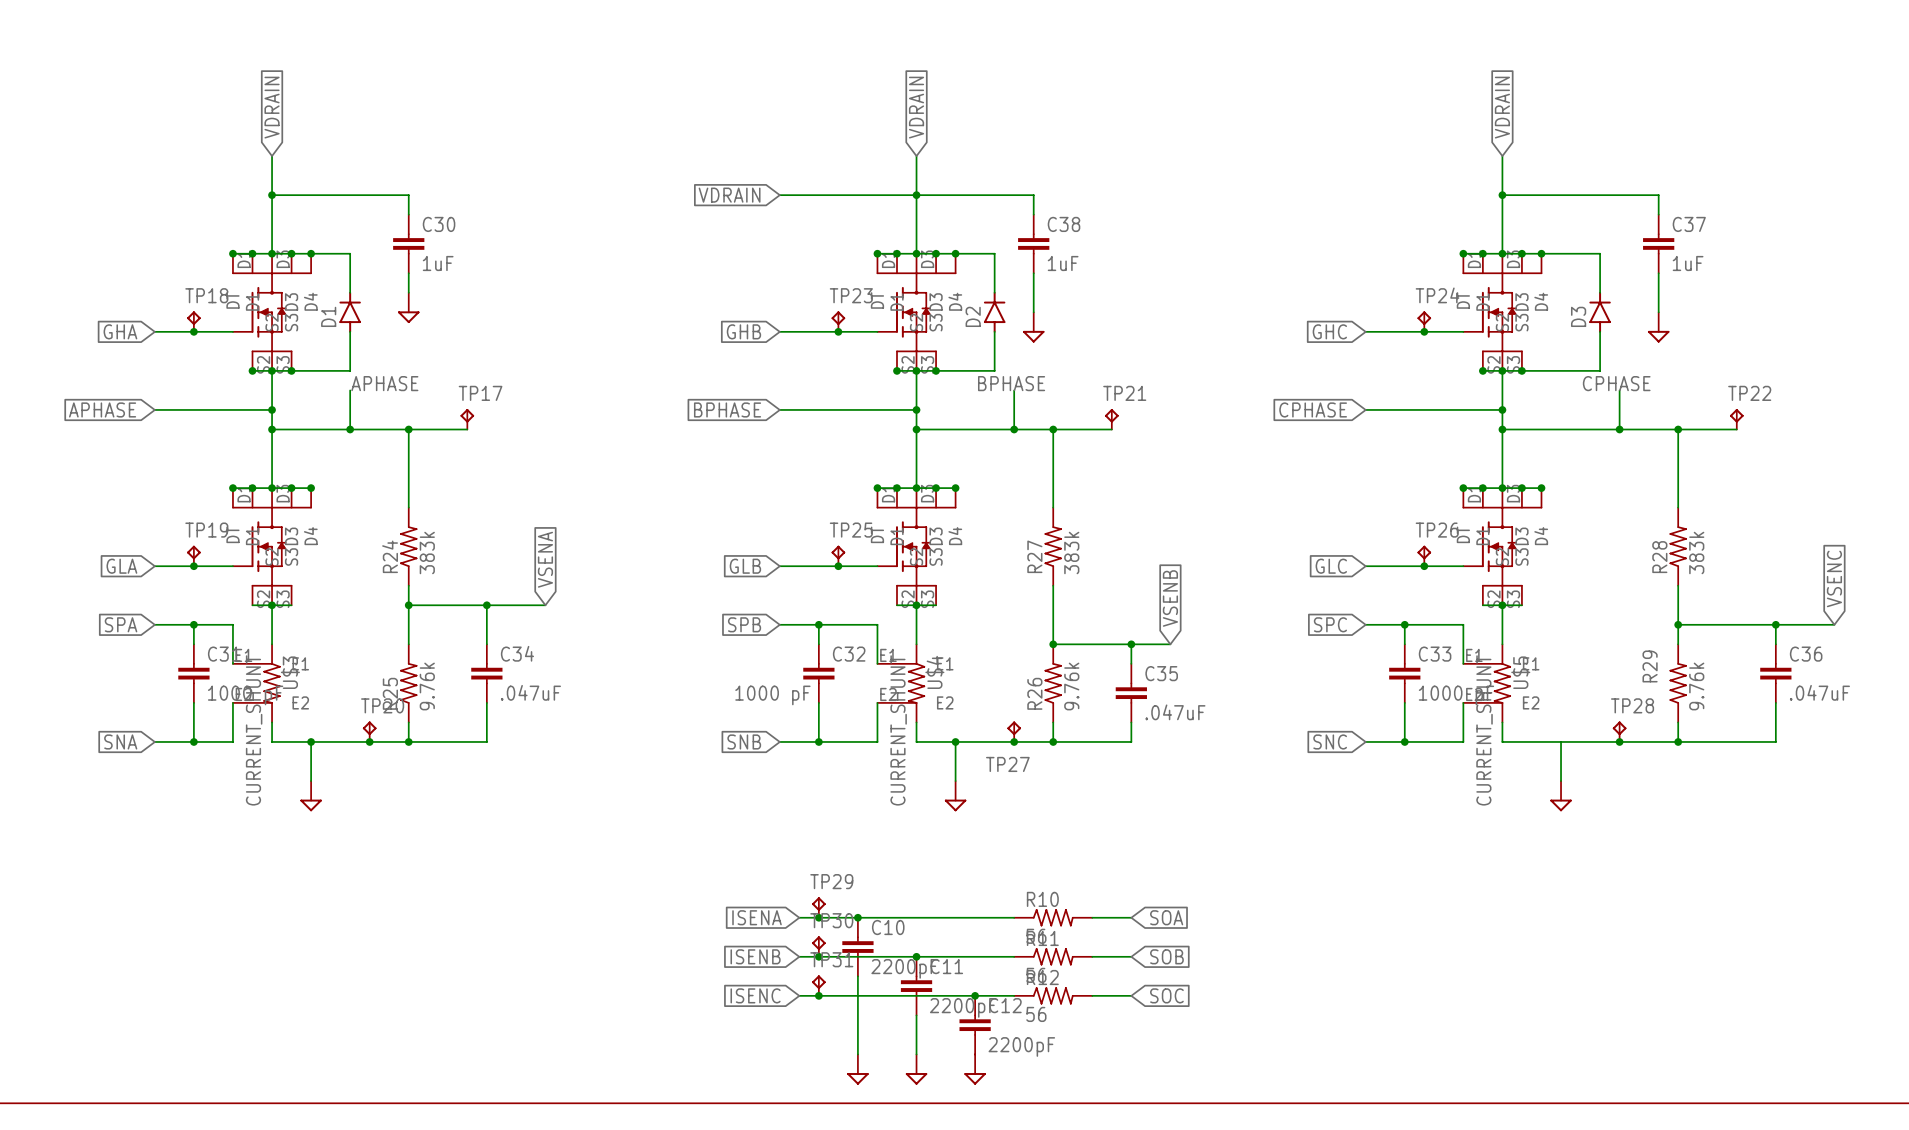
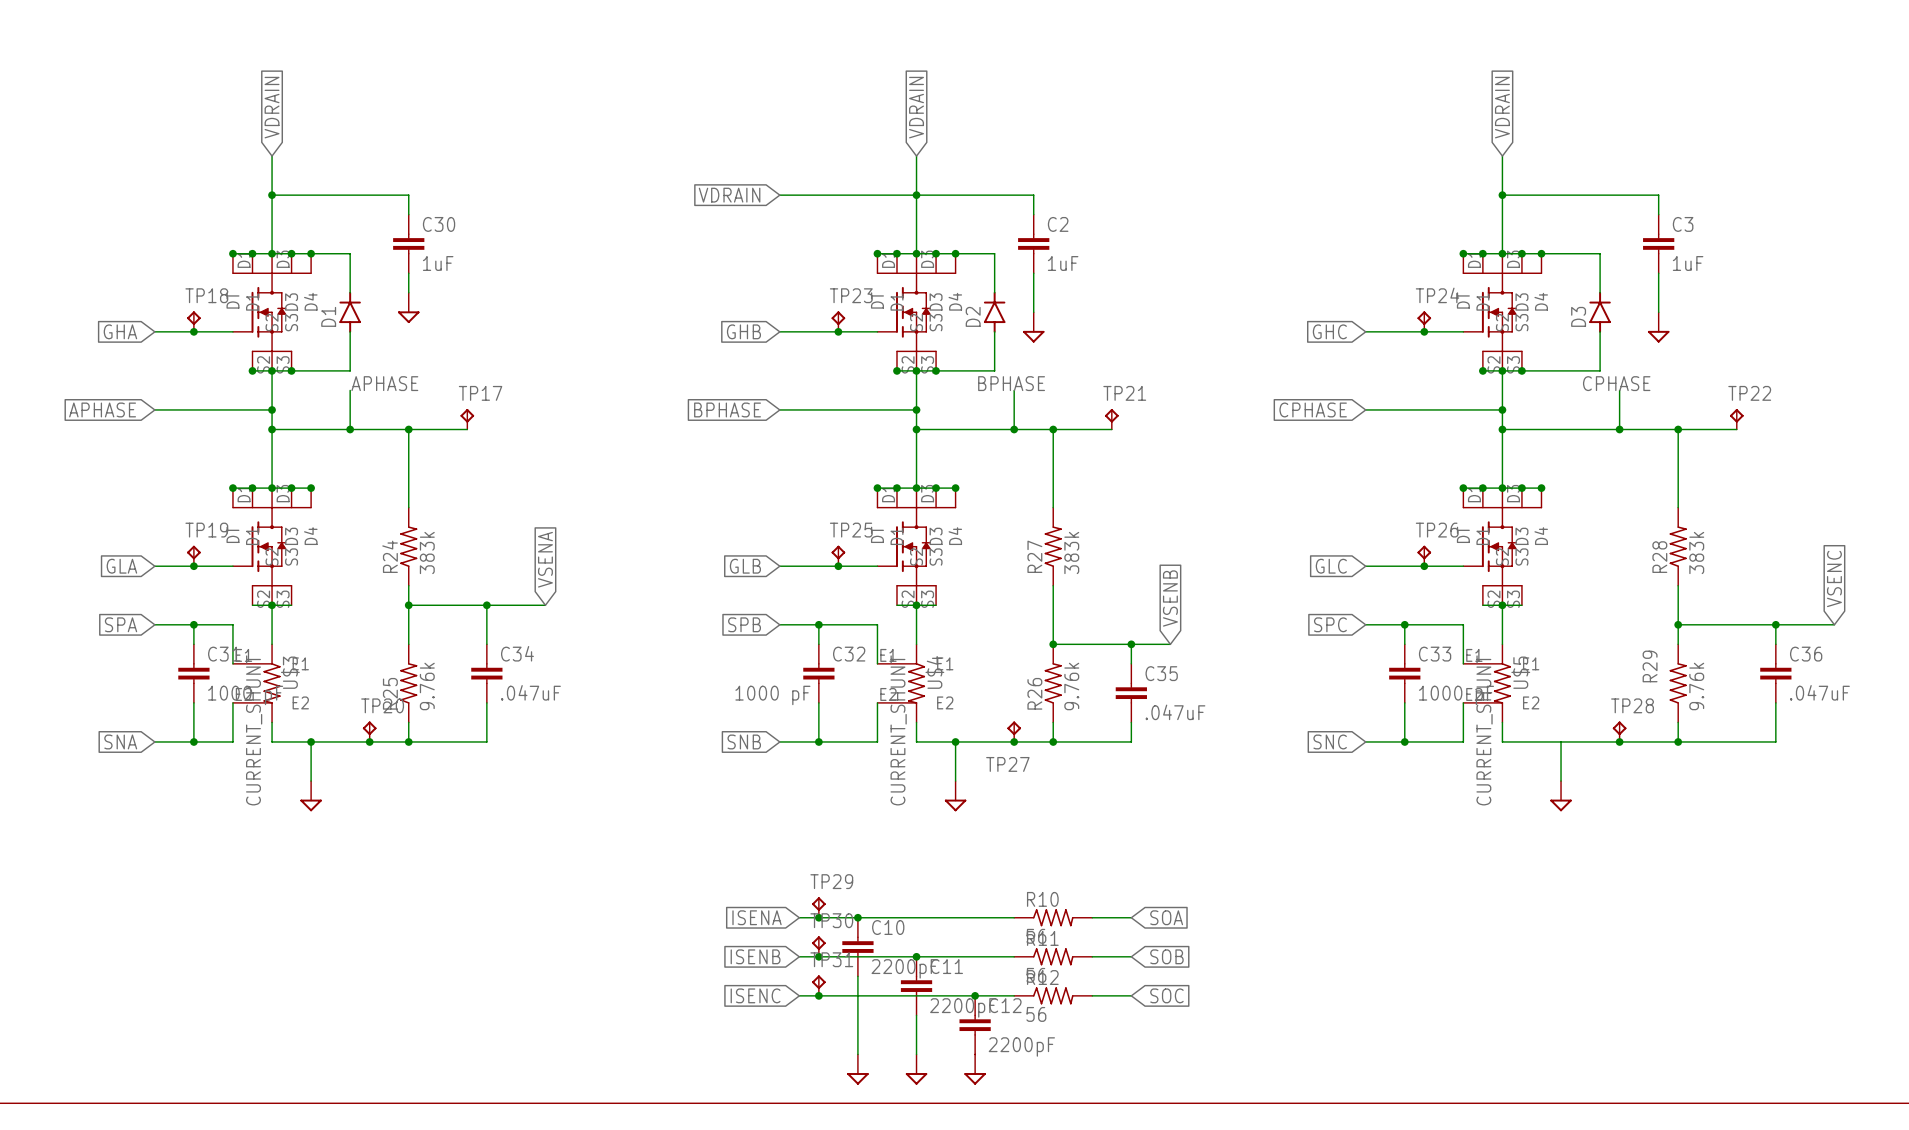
C38 name: C38 (1064, 224) -> C2 (1058, 224)
C37 name: C37 (1689, 224) -> C3 (1683, 224)

